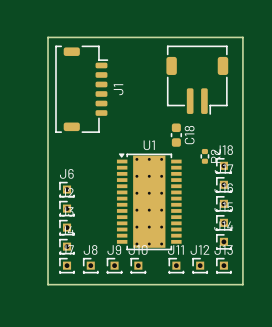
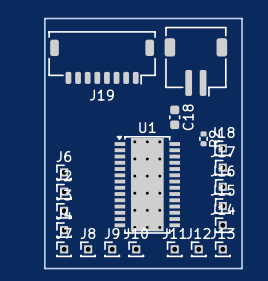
J19: none -> (102, 57)
J1: (81, 89) -> none

